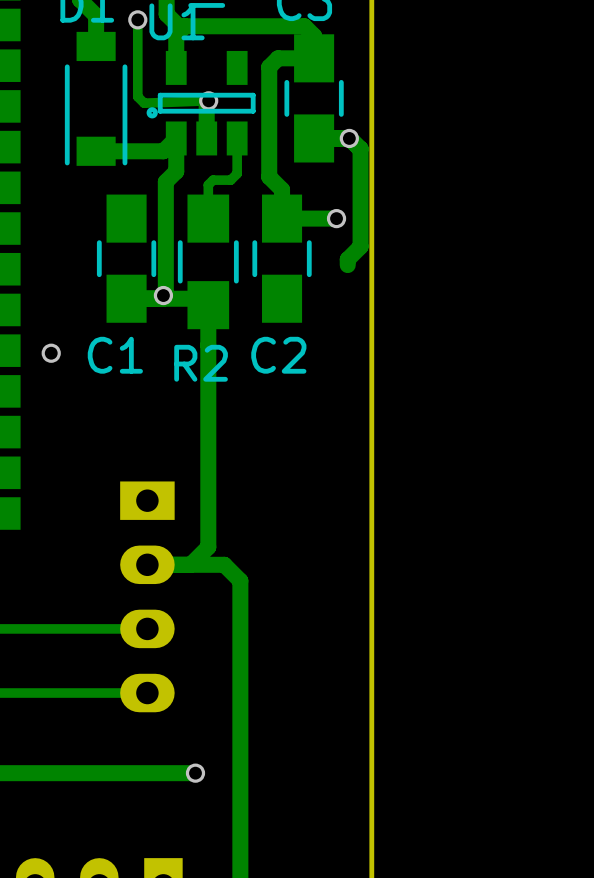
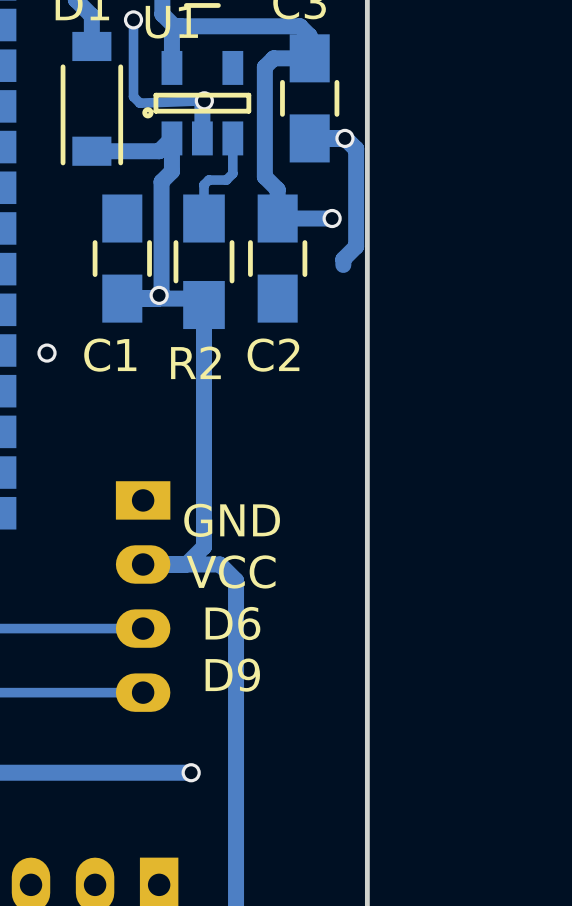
text: none -> GND (232, 520)
text: none -> VCC (231, 571)
text: none -> D6 (232, 623)
text: none -> D9 (232, 675)

